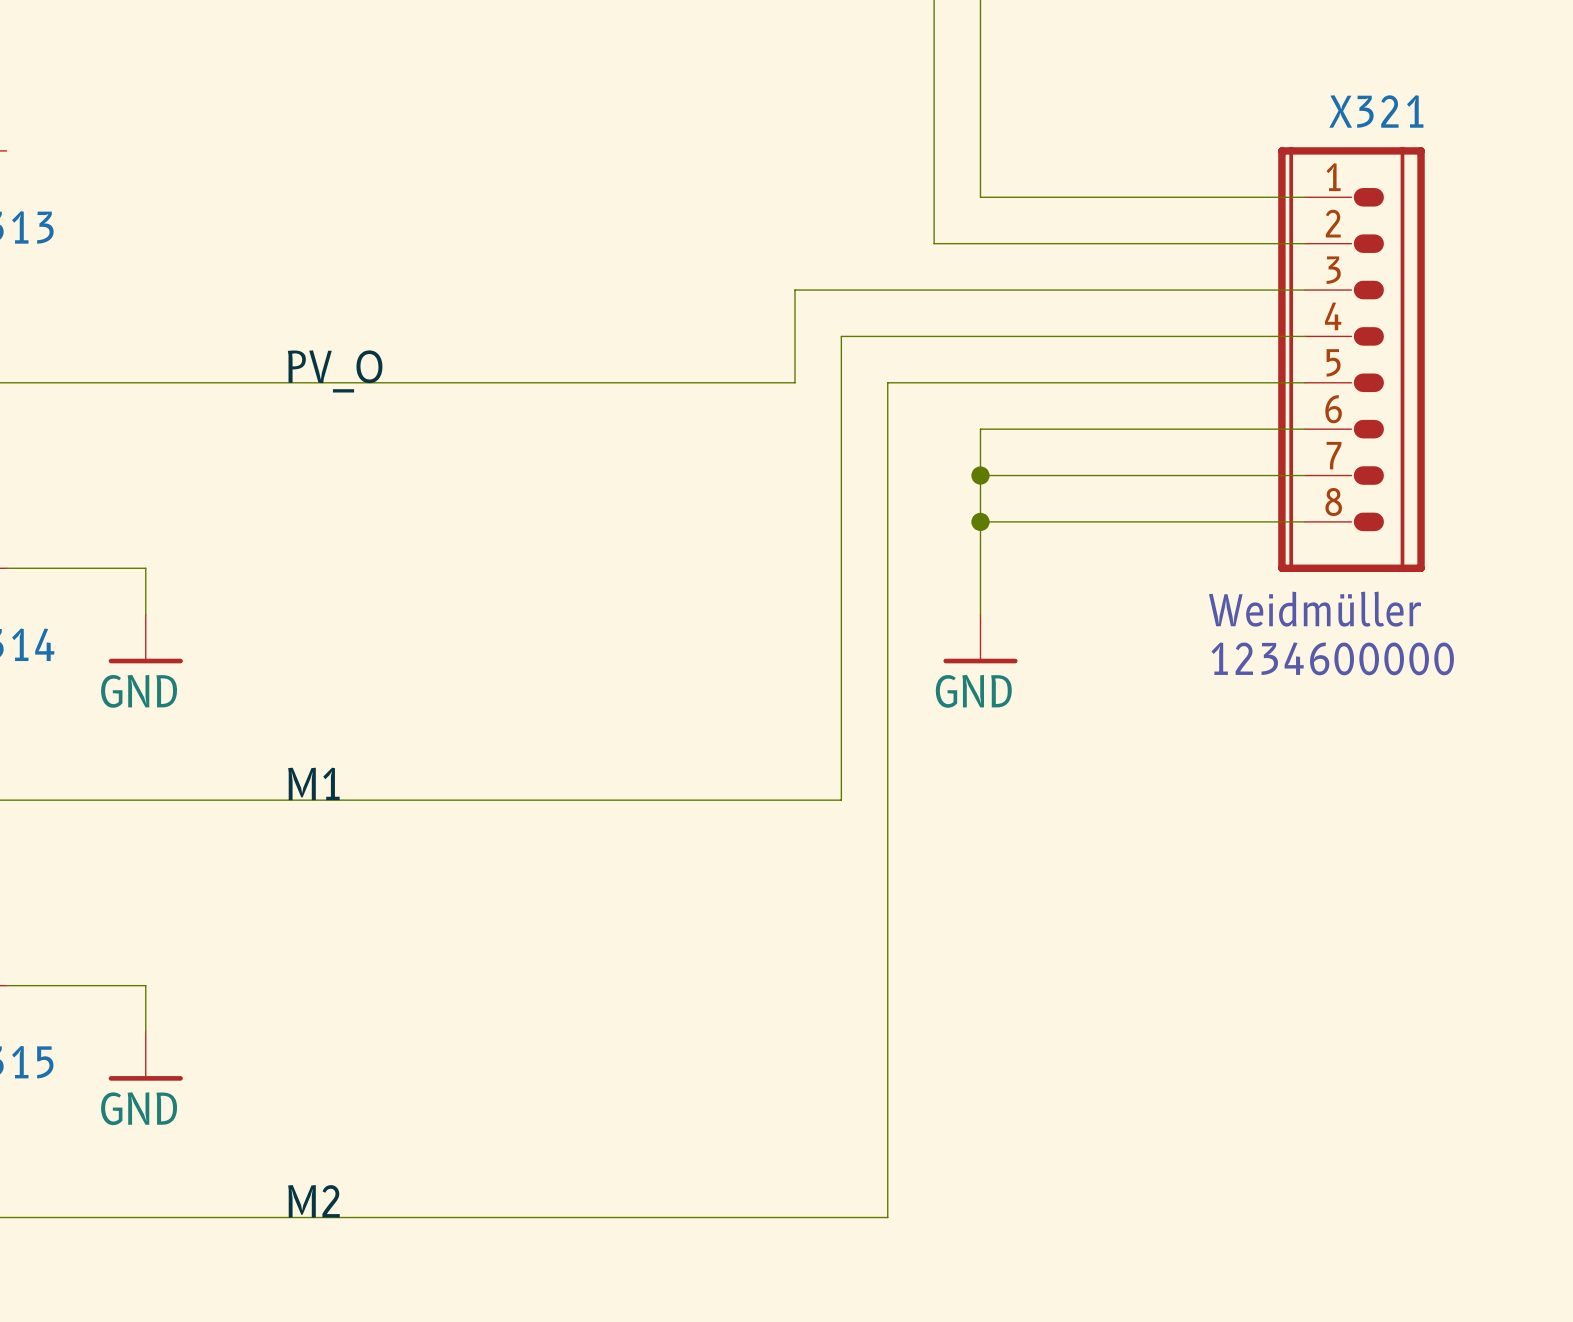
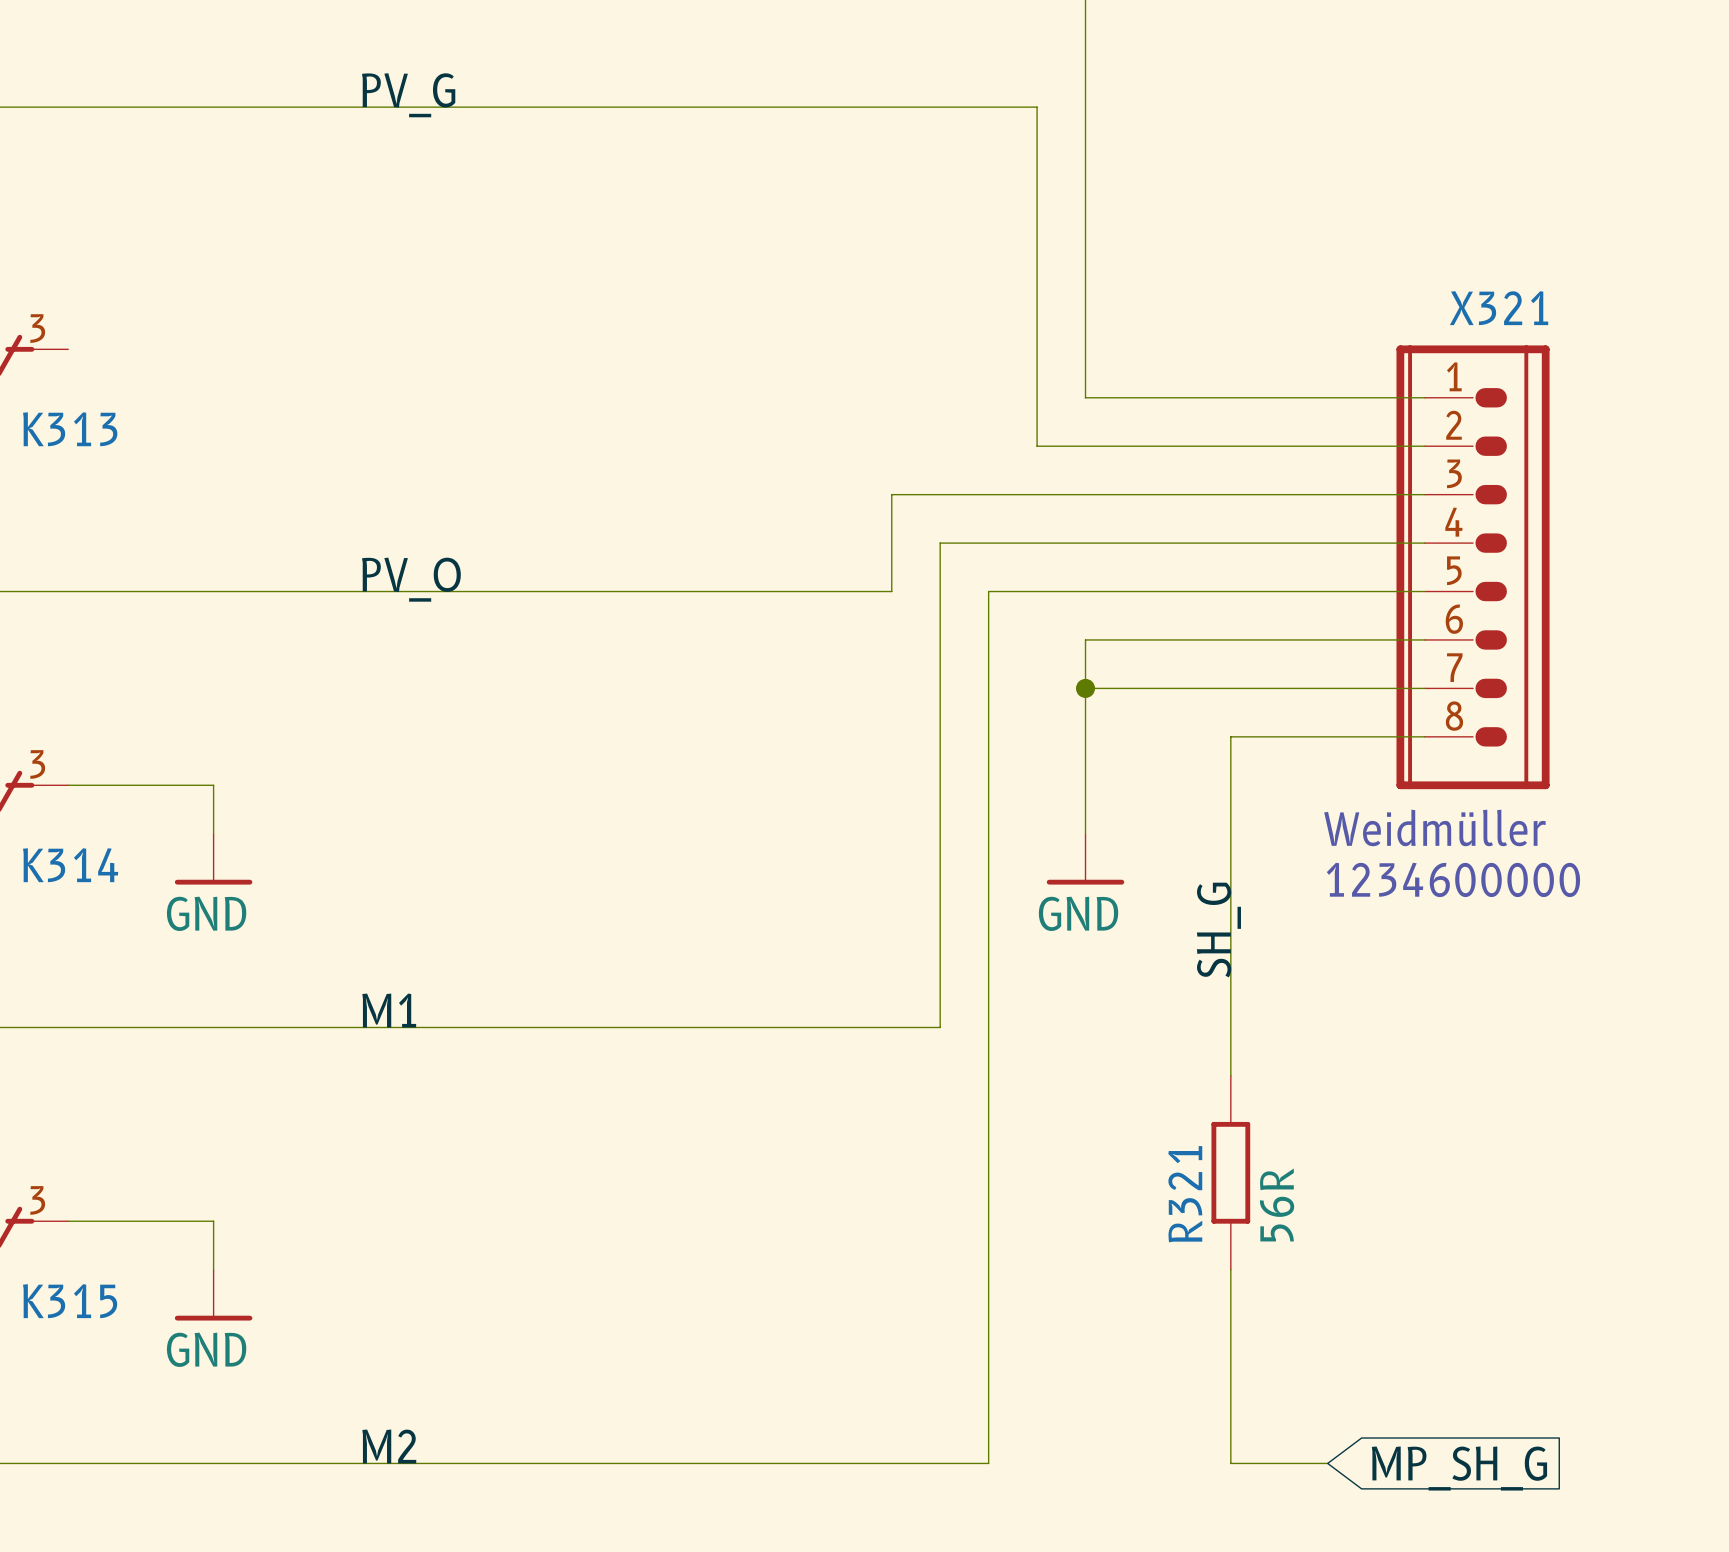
wire: (980, 521) (1119, 521) -> (1230, 1075) (1230, 736)
junction: (980, 521) -> none
label: none -> SH_G (1218, 930)
R321: none -> 56R (1230, 1172)
wire: none -> (1230, 1269) (1230, 1463) (1327, 1463)
global label: none -> MP_SH_G (1459, 1468)

